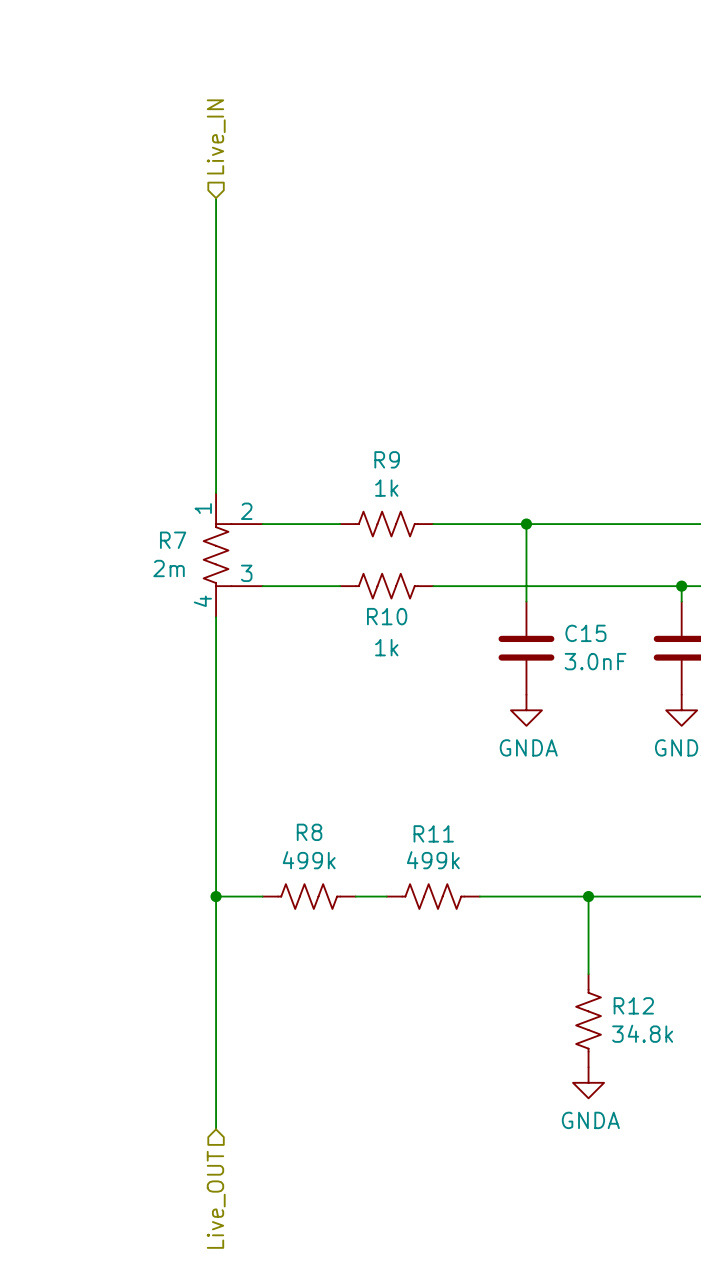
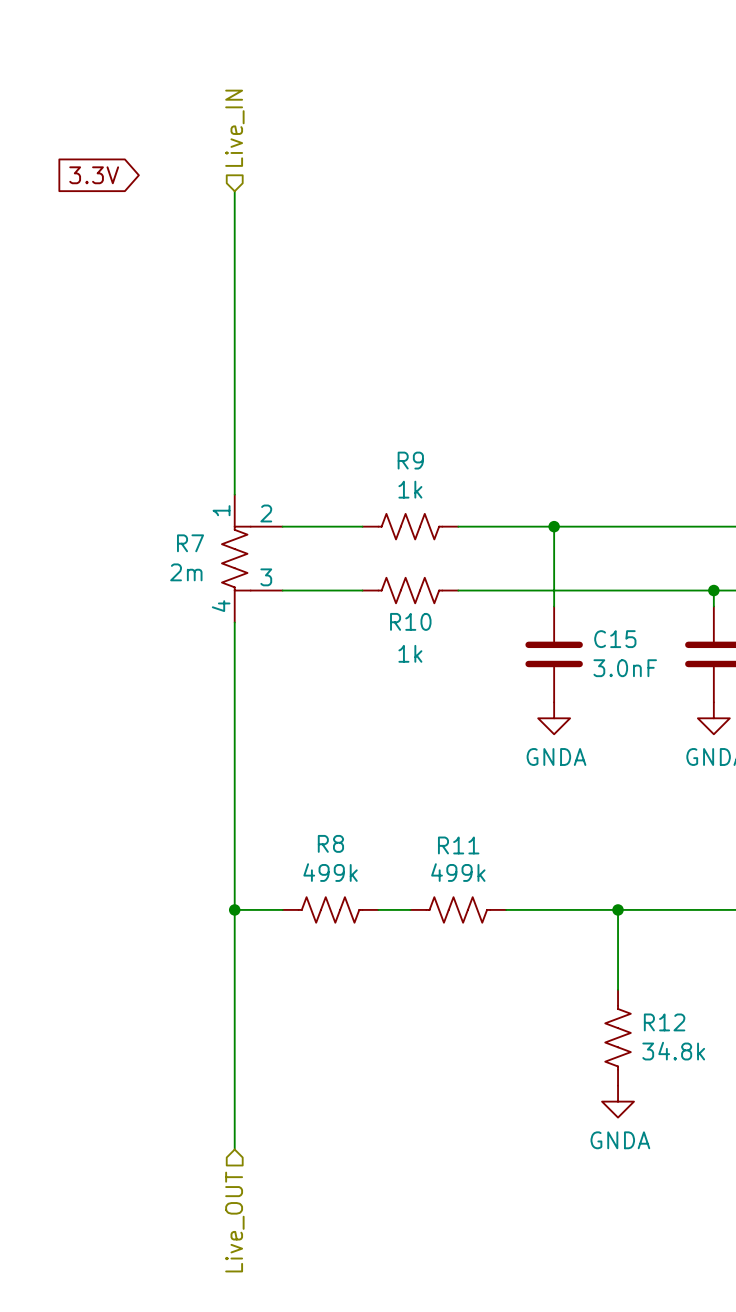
global label: none -> 3.3V (94, 175)

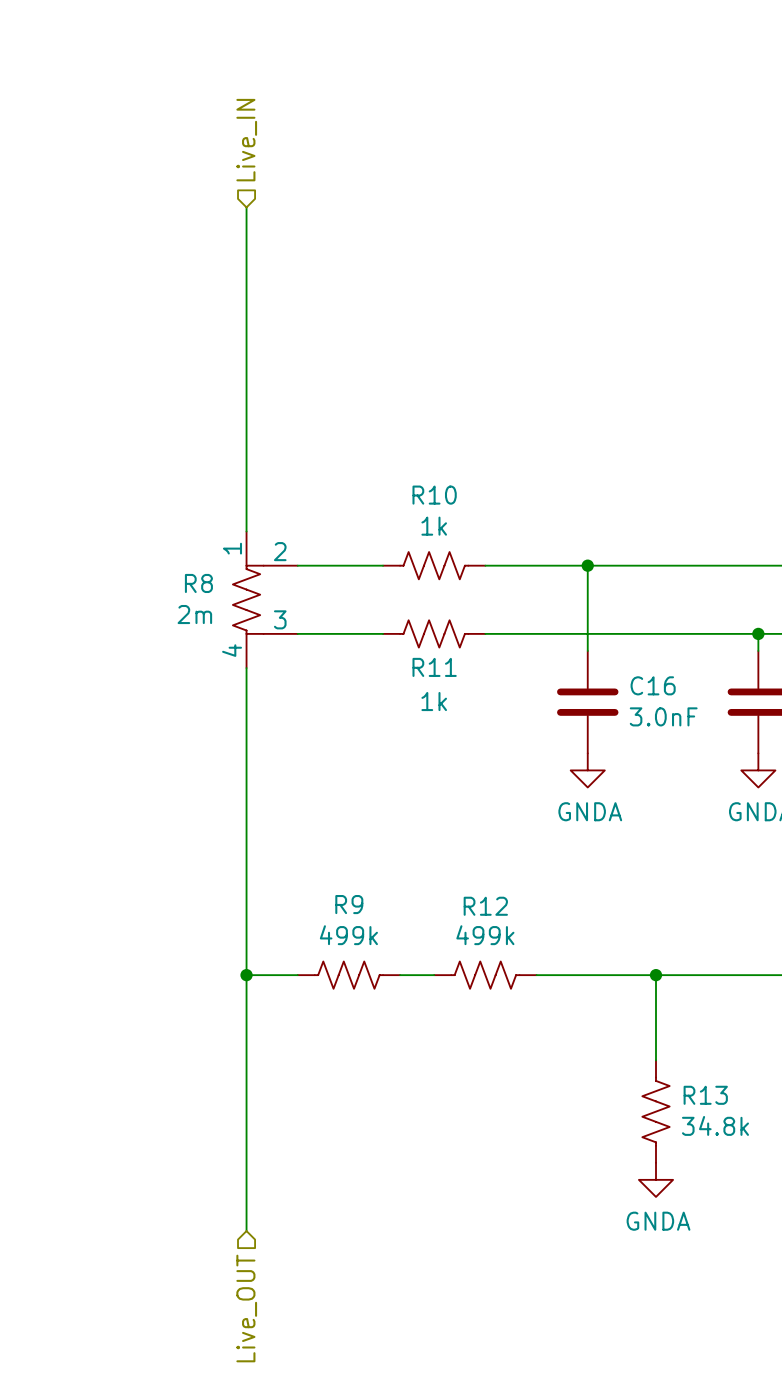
global label: 3.3V (94, 175) -> none
R9 name: R9 (410, 460) -> R10 (434, 495)
R7 name: R7 (190, 543) -> R8 (198, 583)
R10 name: R10 (410, 621) -> R11 (434, 667)
C15 name: C15 (615, 639) -> C16 (653, 685)
R8 name: R8 (330, 843) -> R9 (349, 904)
R11 name: R11 (458, 845) -> R12 (485, 906)
R12 name: R12 (664, 1022) -> R13 (705, 1095)

